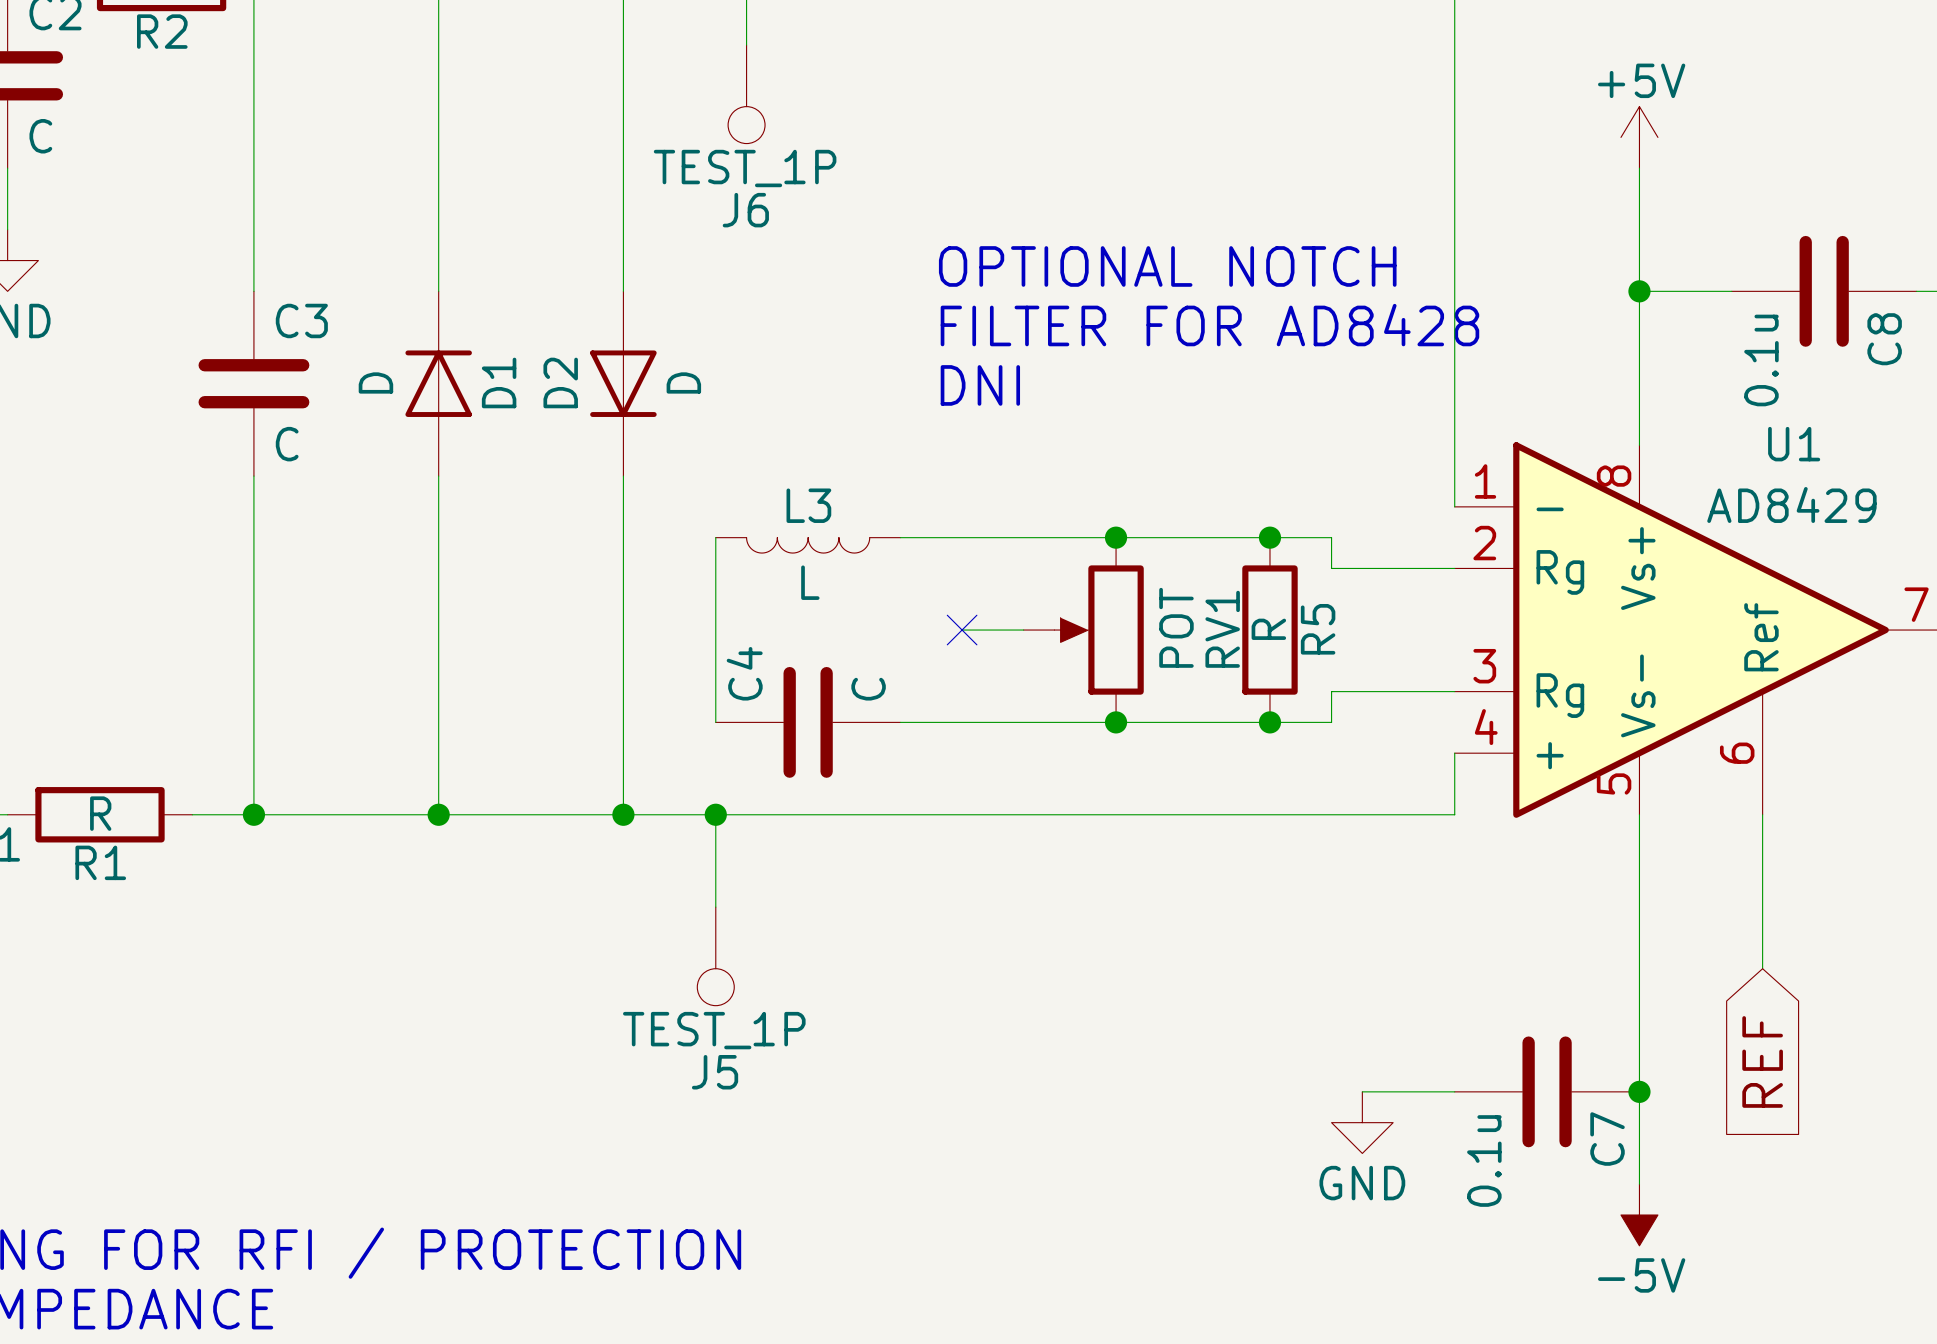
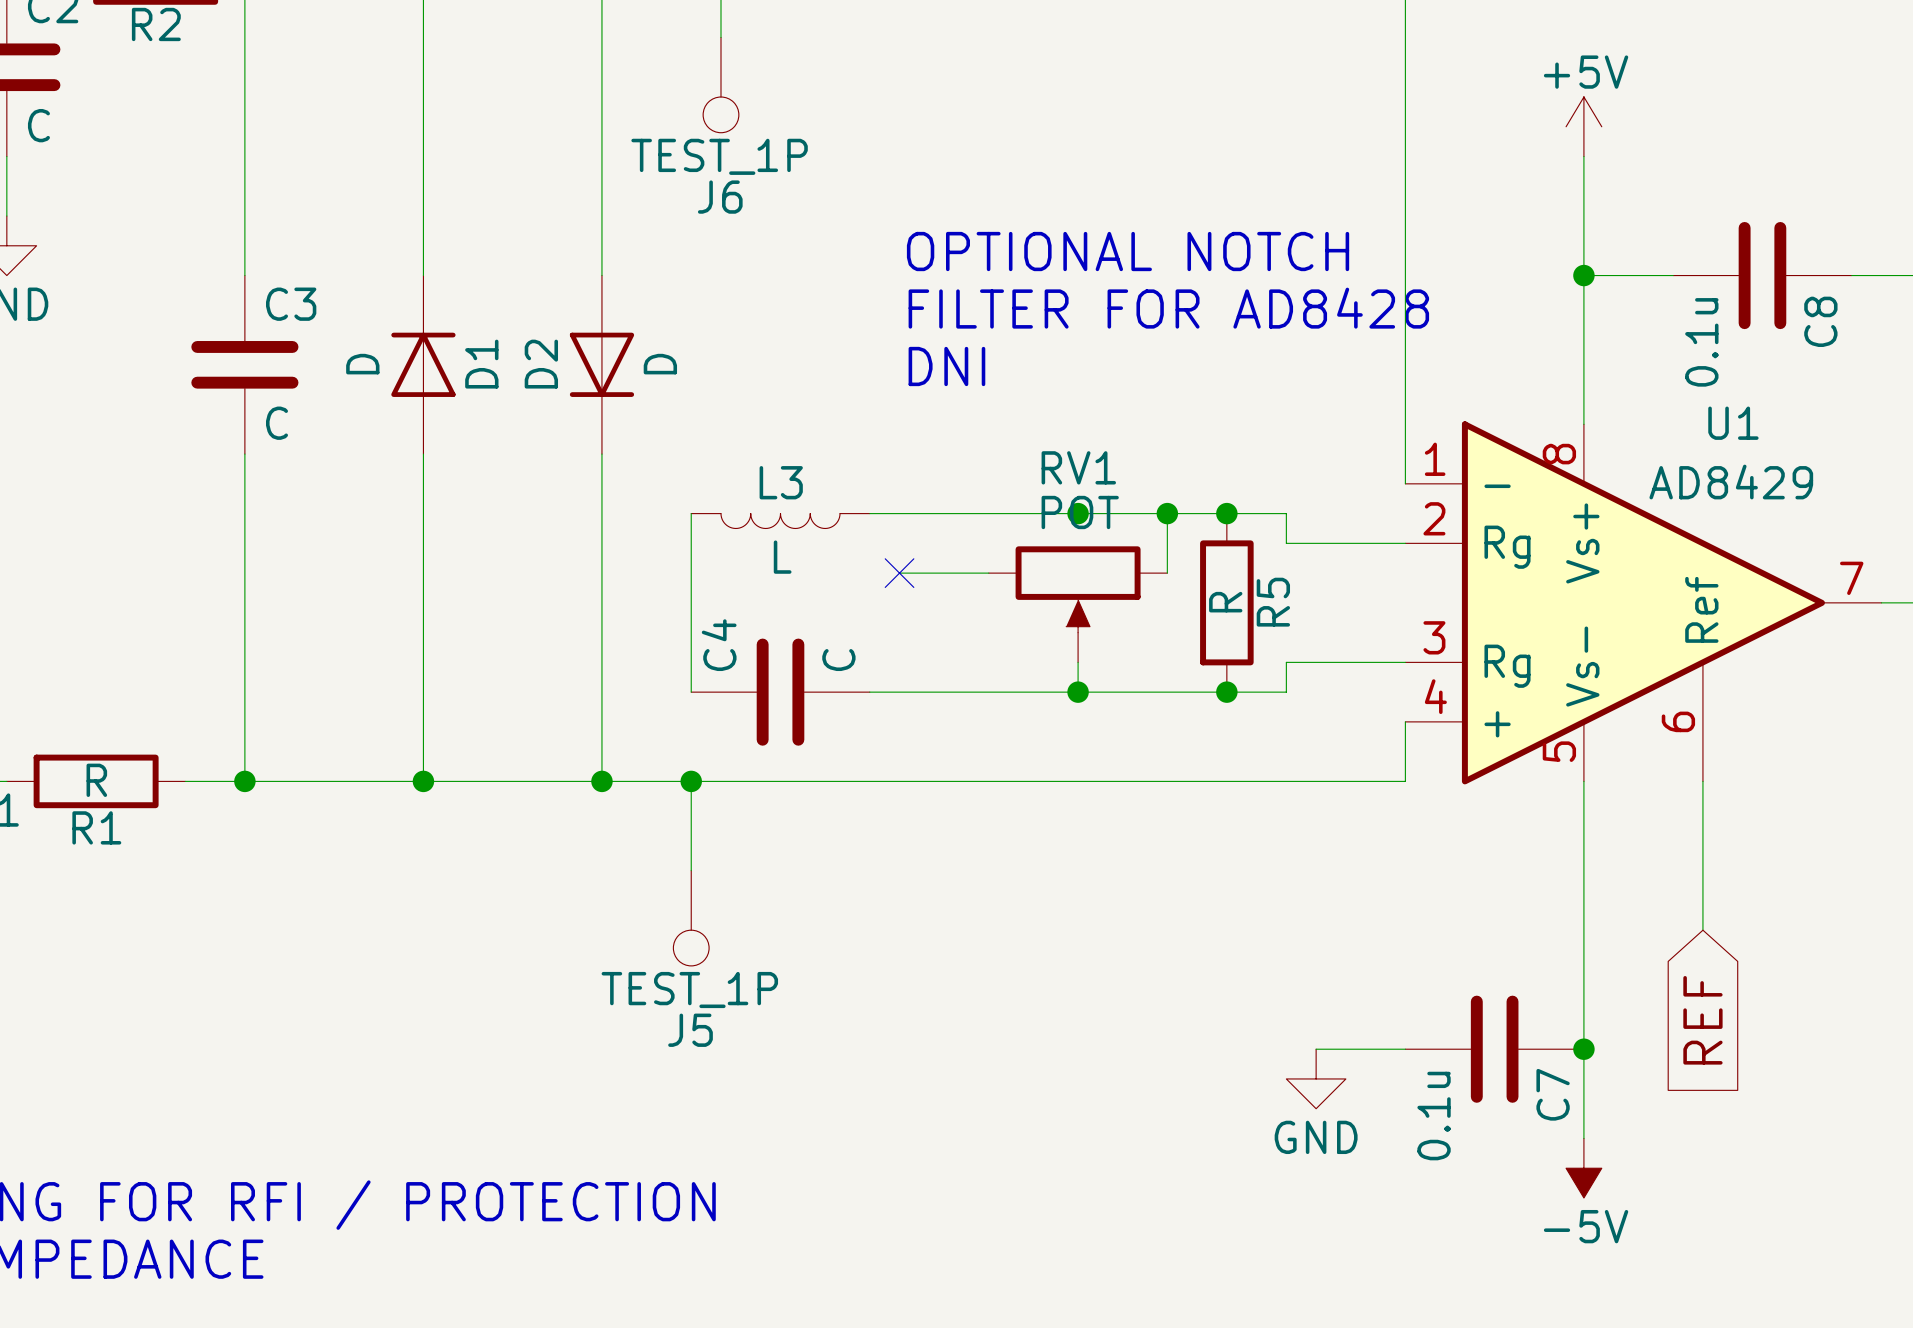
wire: none -> (1167, 513) (1167, 573)
junction: none -> (1167, 513)
wire: none -> (899, 573) (988, 573)
wire: (962, 630) (1023, 630) -> none
no-connect mark position: (962, 630) -> (899, 573)
RV1 rotation: 0° (1099, 630) -> 90° counterclockwise (1078, 589)

